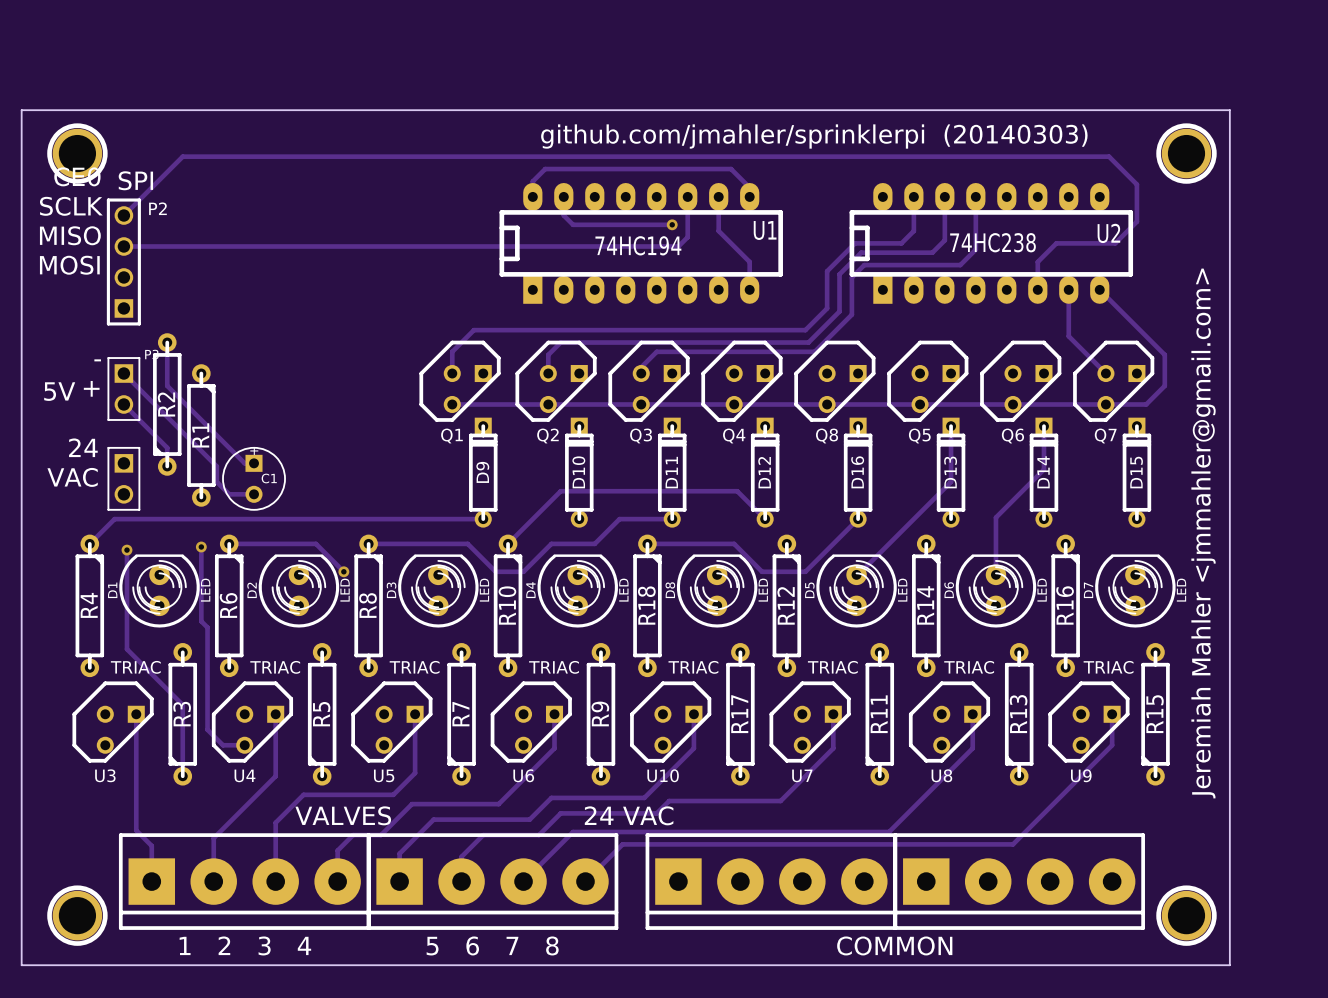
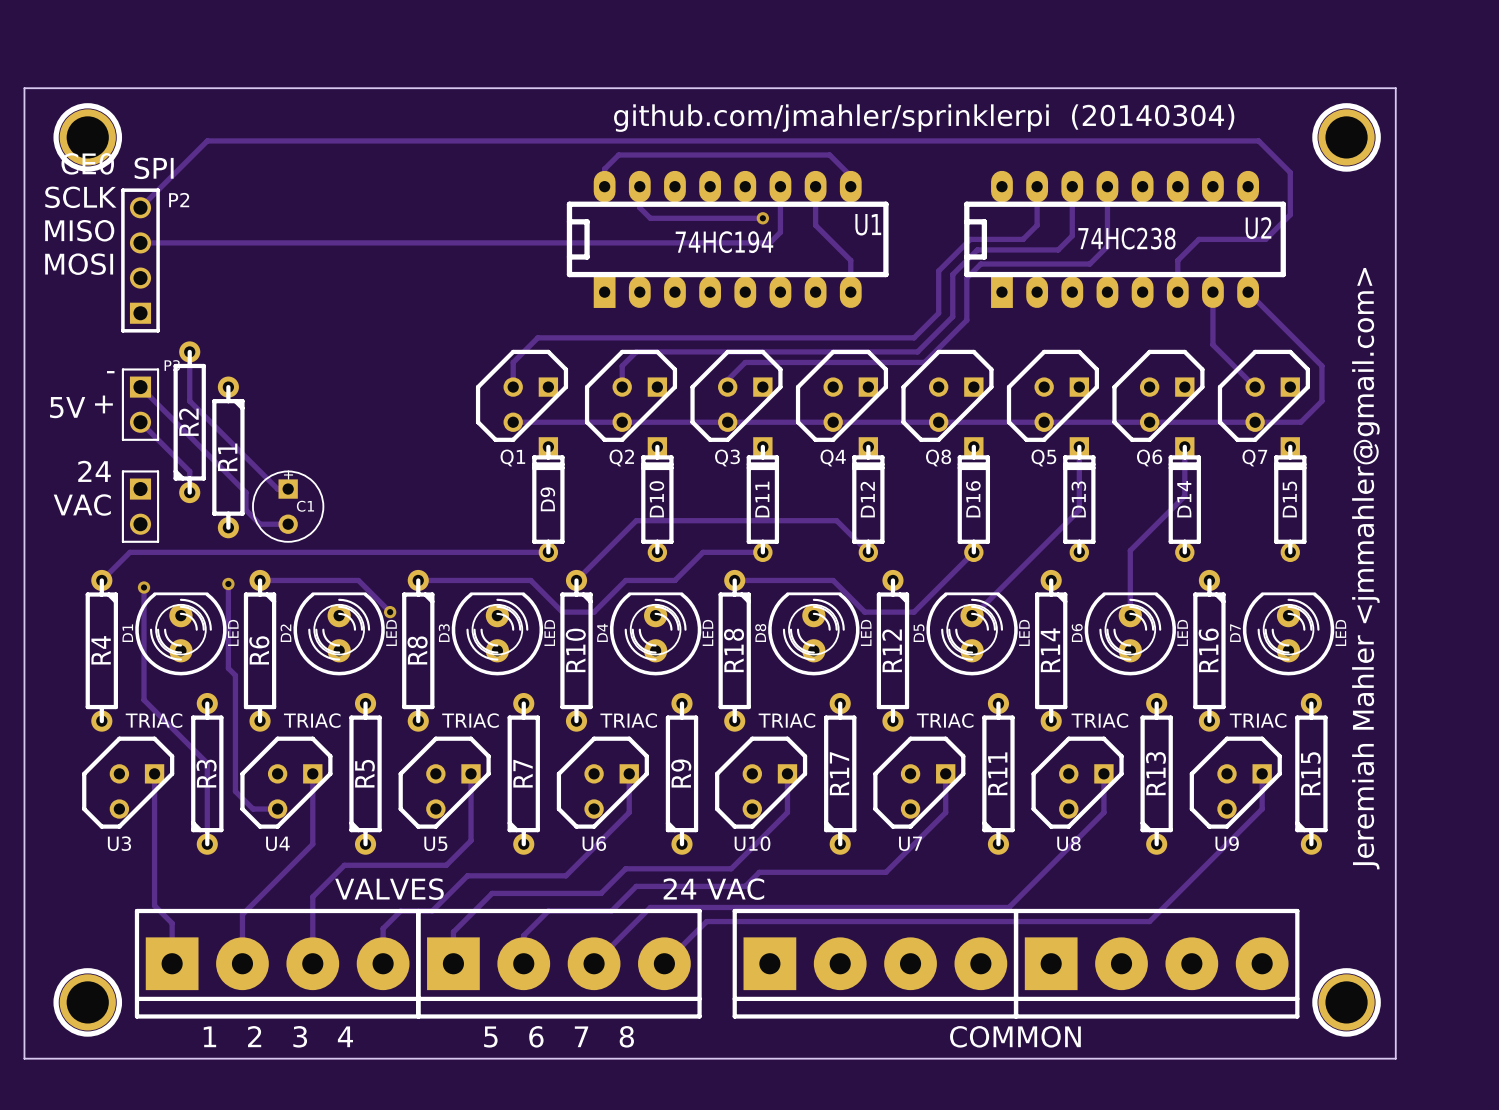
text: github.com/jmahler/sprinklerpi (20140303) (814, 136) -> github.com/jmahler/sprinklerpi (20140304) (924, 118)

